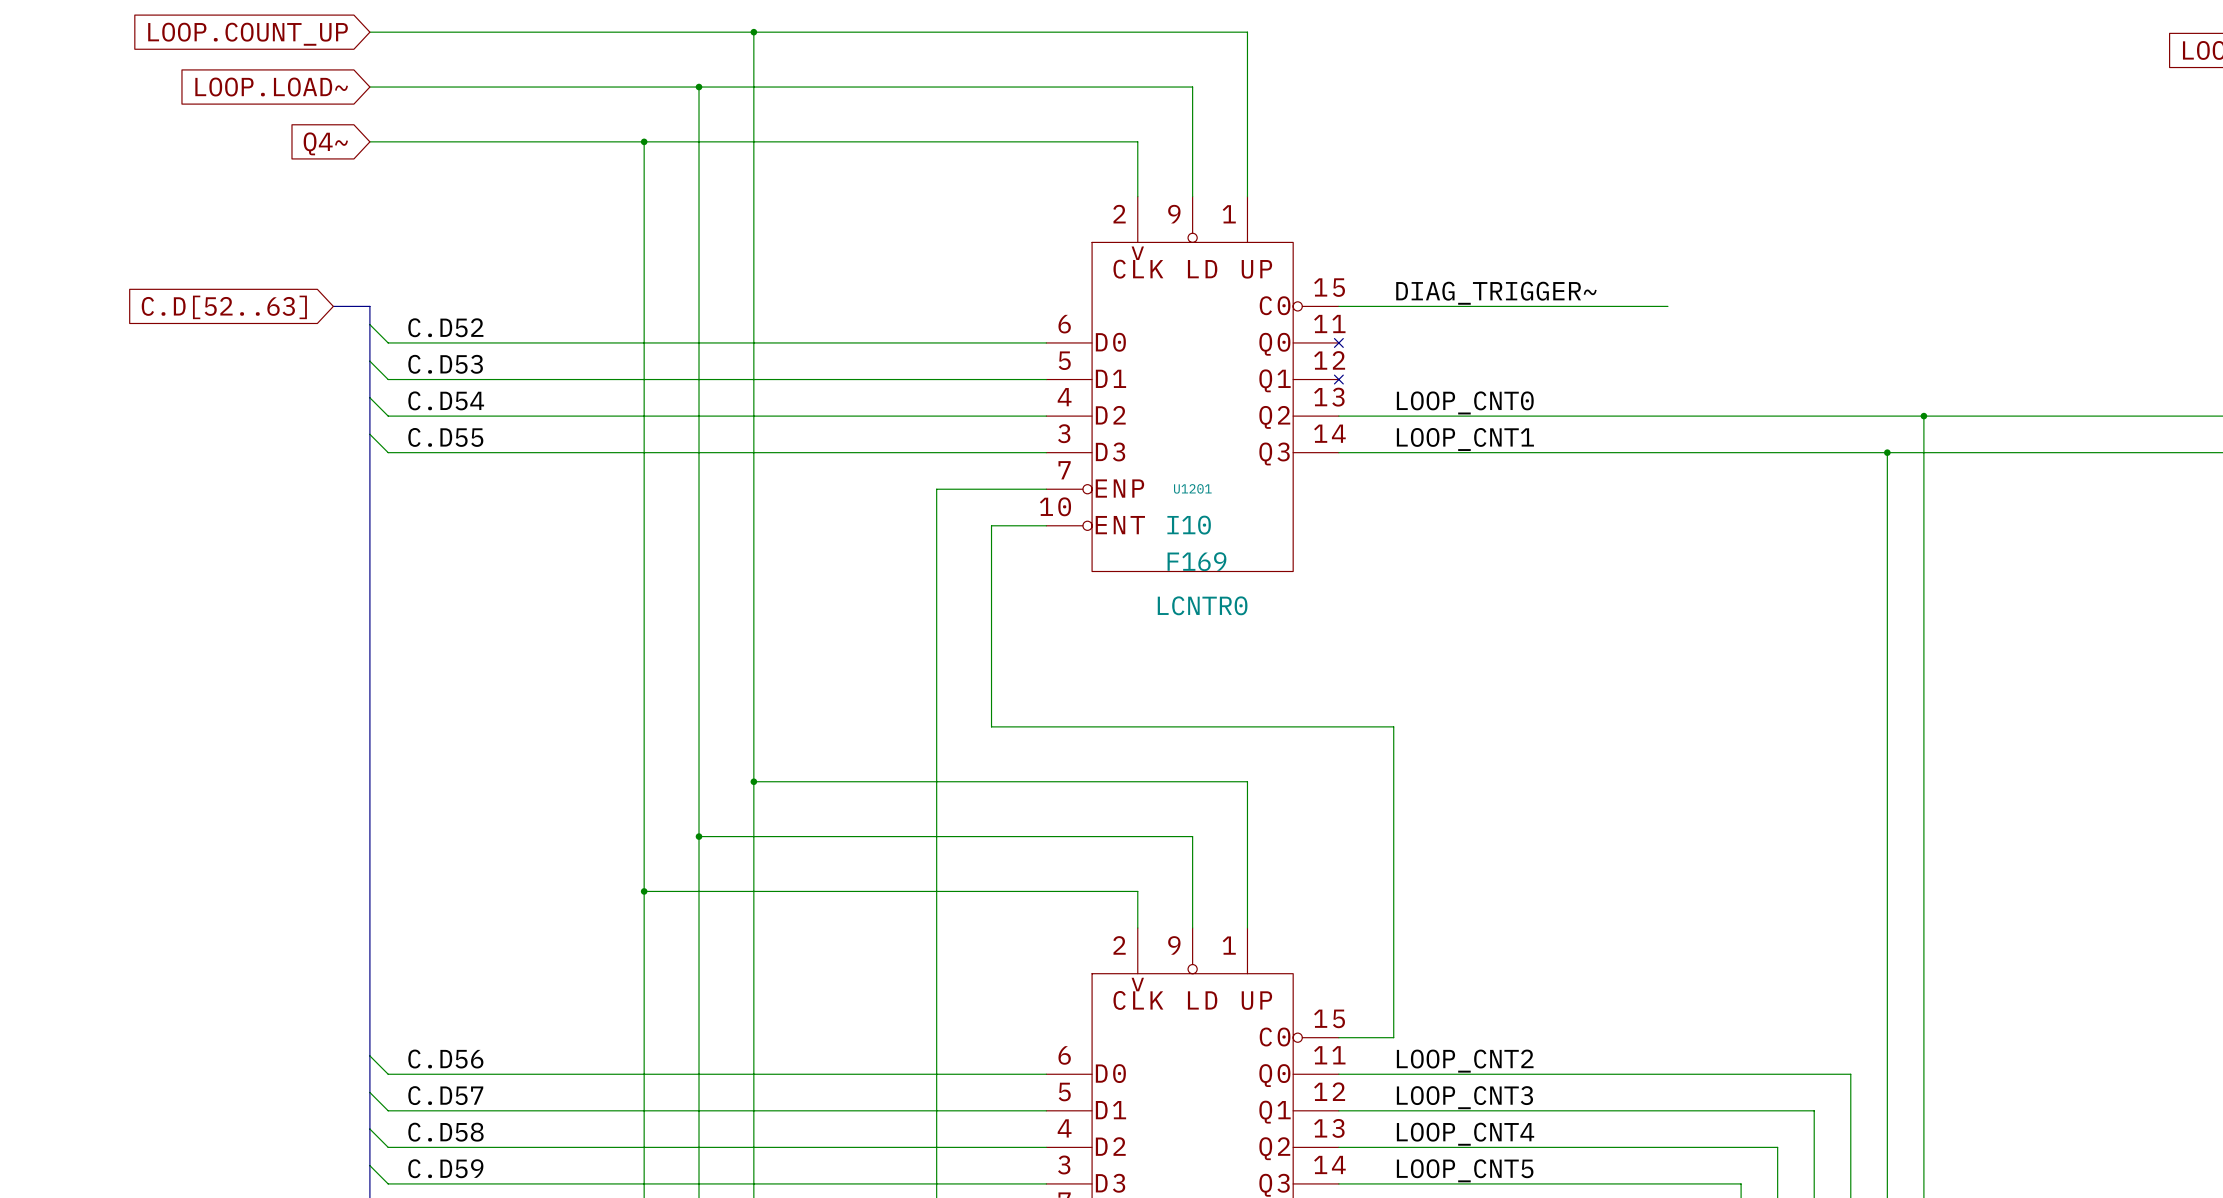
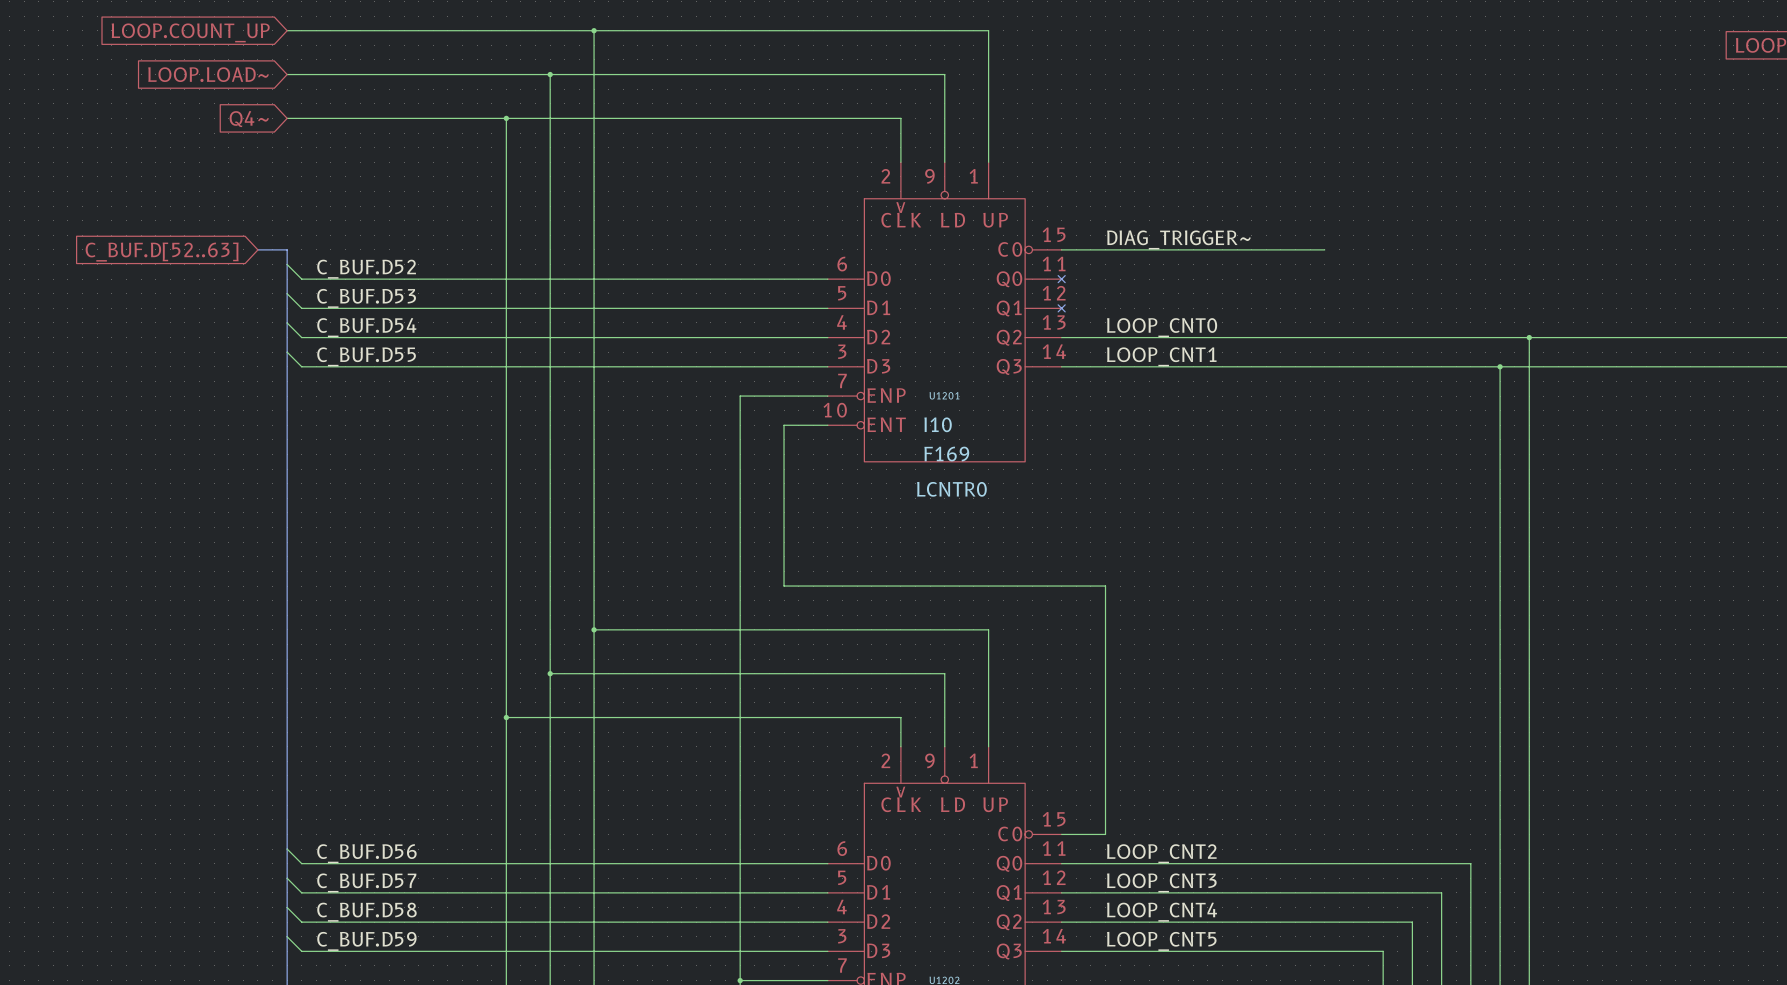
global label: C.D[52..63] (224, 307) -> C_BUF.D[52..63] (162, 252)
label: C.D52 (445, 327) -> C_BUF.D52 (366, 269)
label: C.D53 (445, 364) -> C_BUF.D53 (366, 298)
label: C.D54 (446, 400) -> C_BUF.D54 (366, 327)
label: C.D55 (445, 437) -> C_BUF.D55 (366, 356)
label: C.D56 (445, 1059) -> C_BUF.D56 (366, 853)
label: C.D57 (445, 1095) -> C_BUF.D57 (366, 882)
label: C.D58 (445, 1132) -> C_BUF.D58 (366, 912)
label: C.D59 (445, 1168) -> C_BUF.D59 (366, 941)

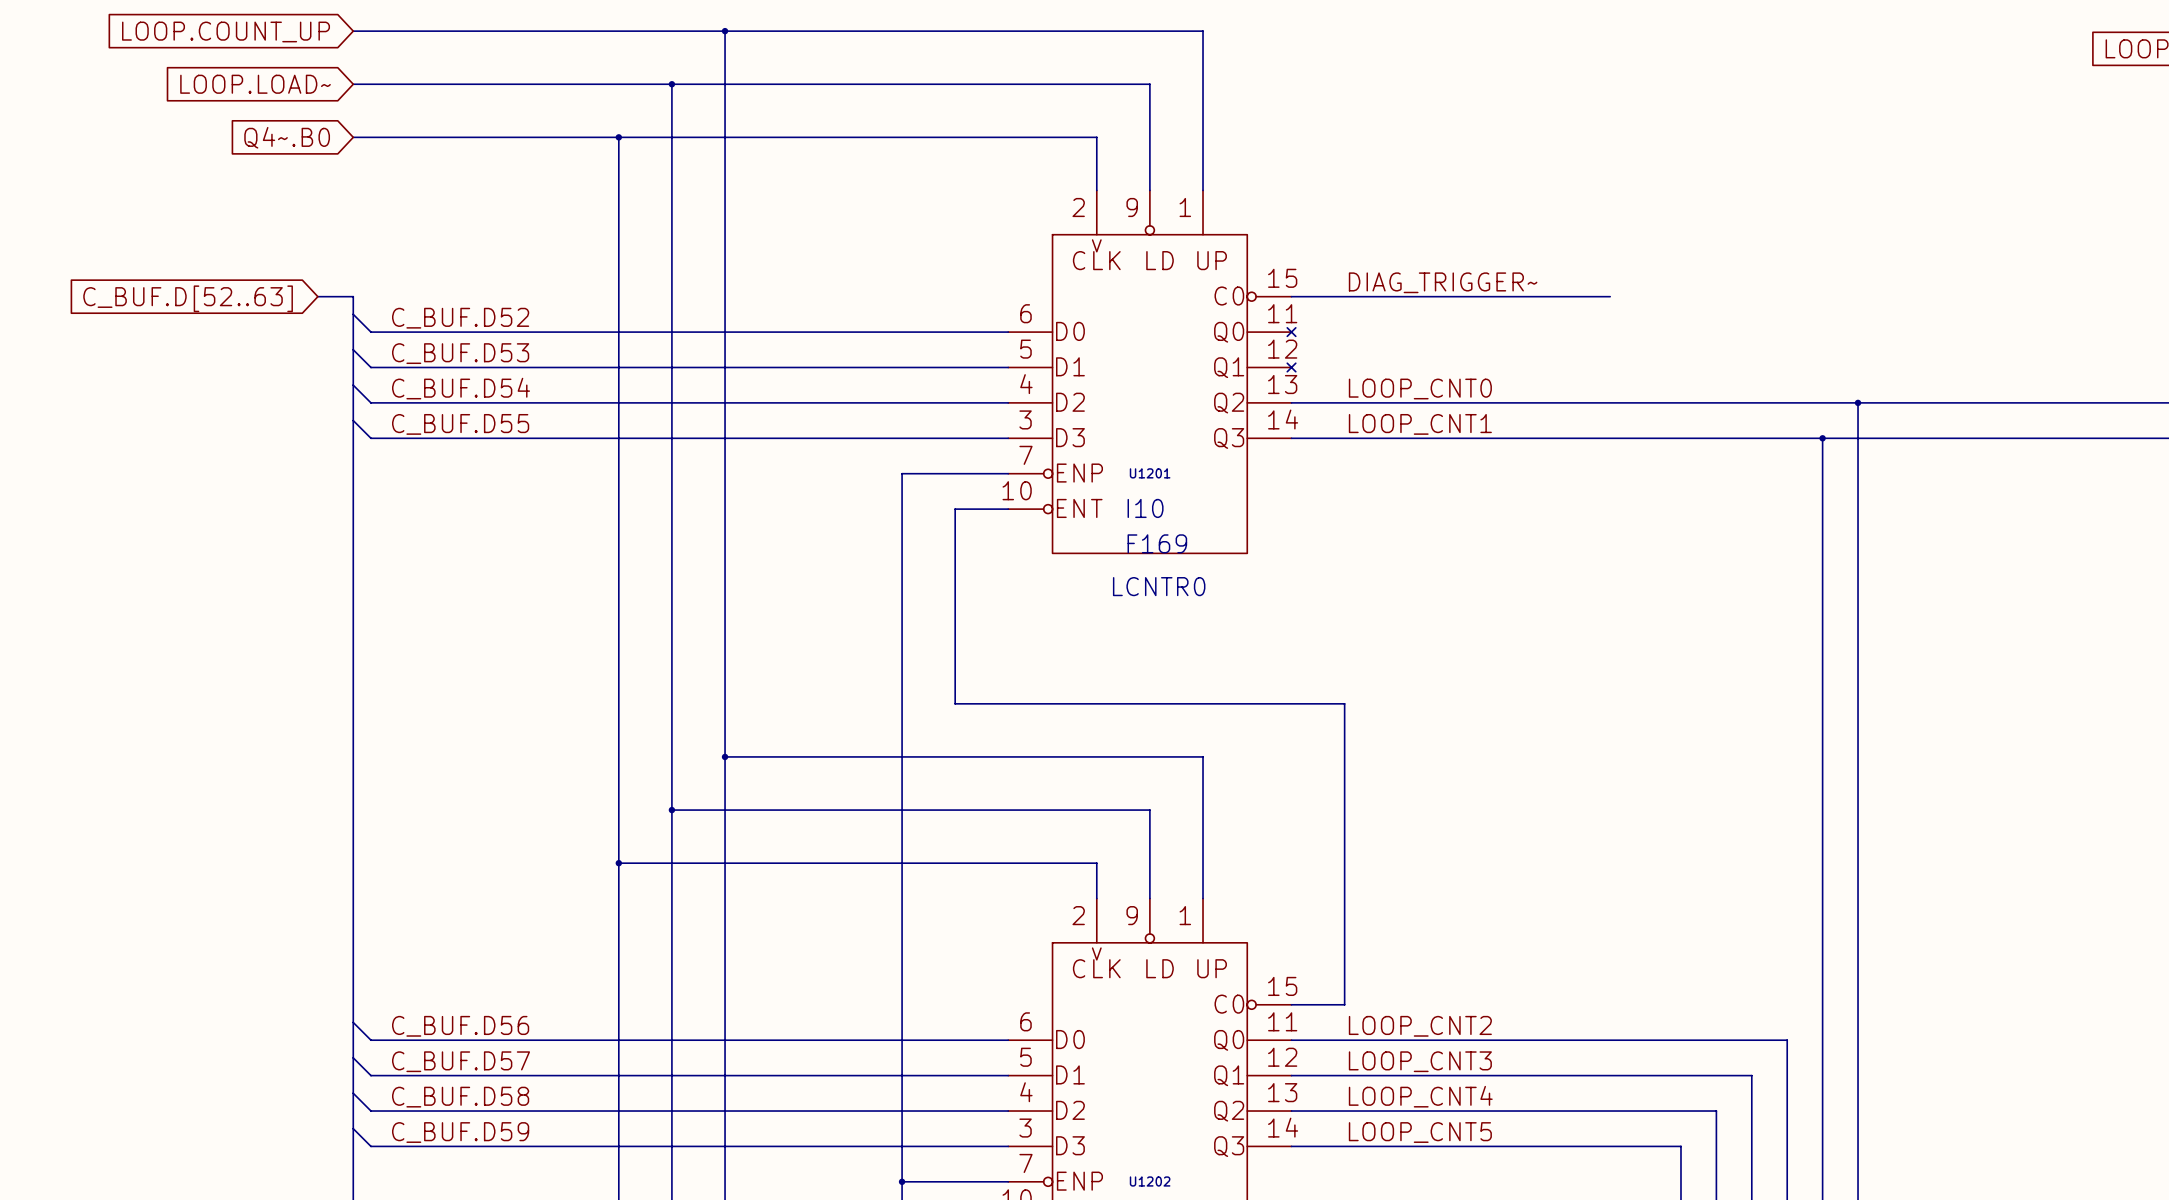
global label: Q4~ (249, 119) -> Q4~.B0 (287, 137)

